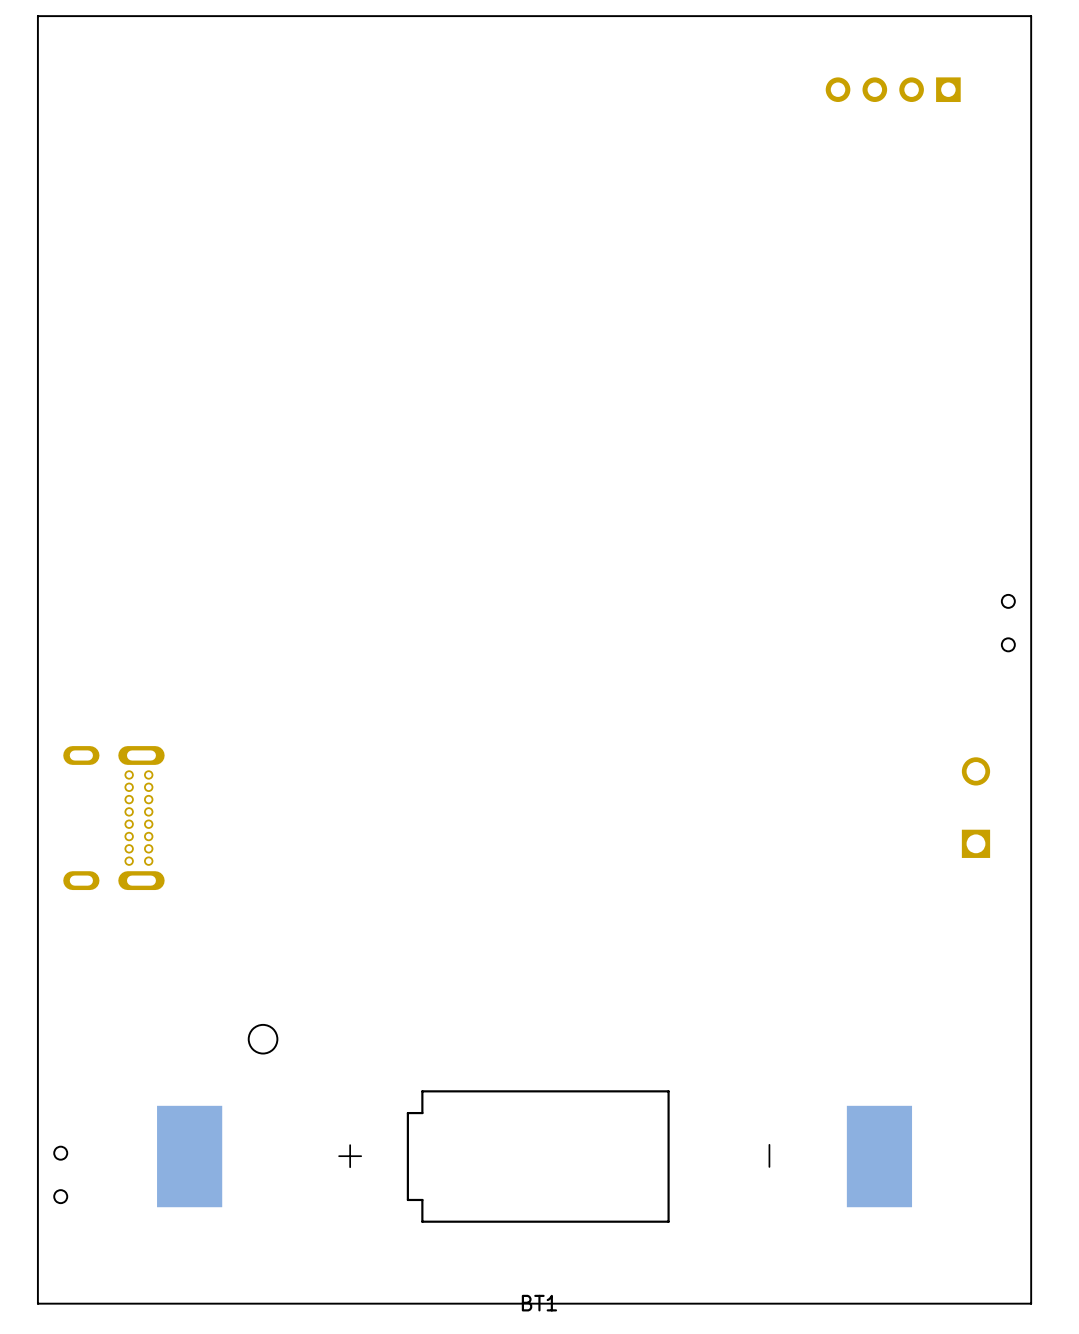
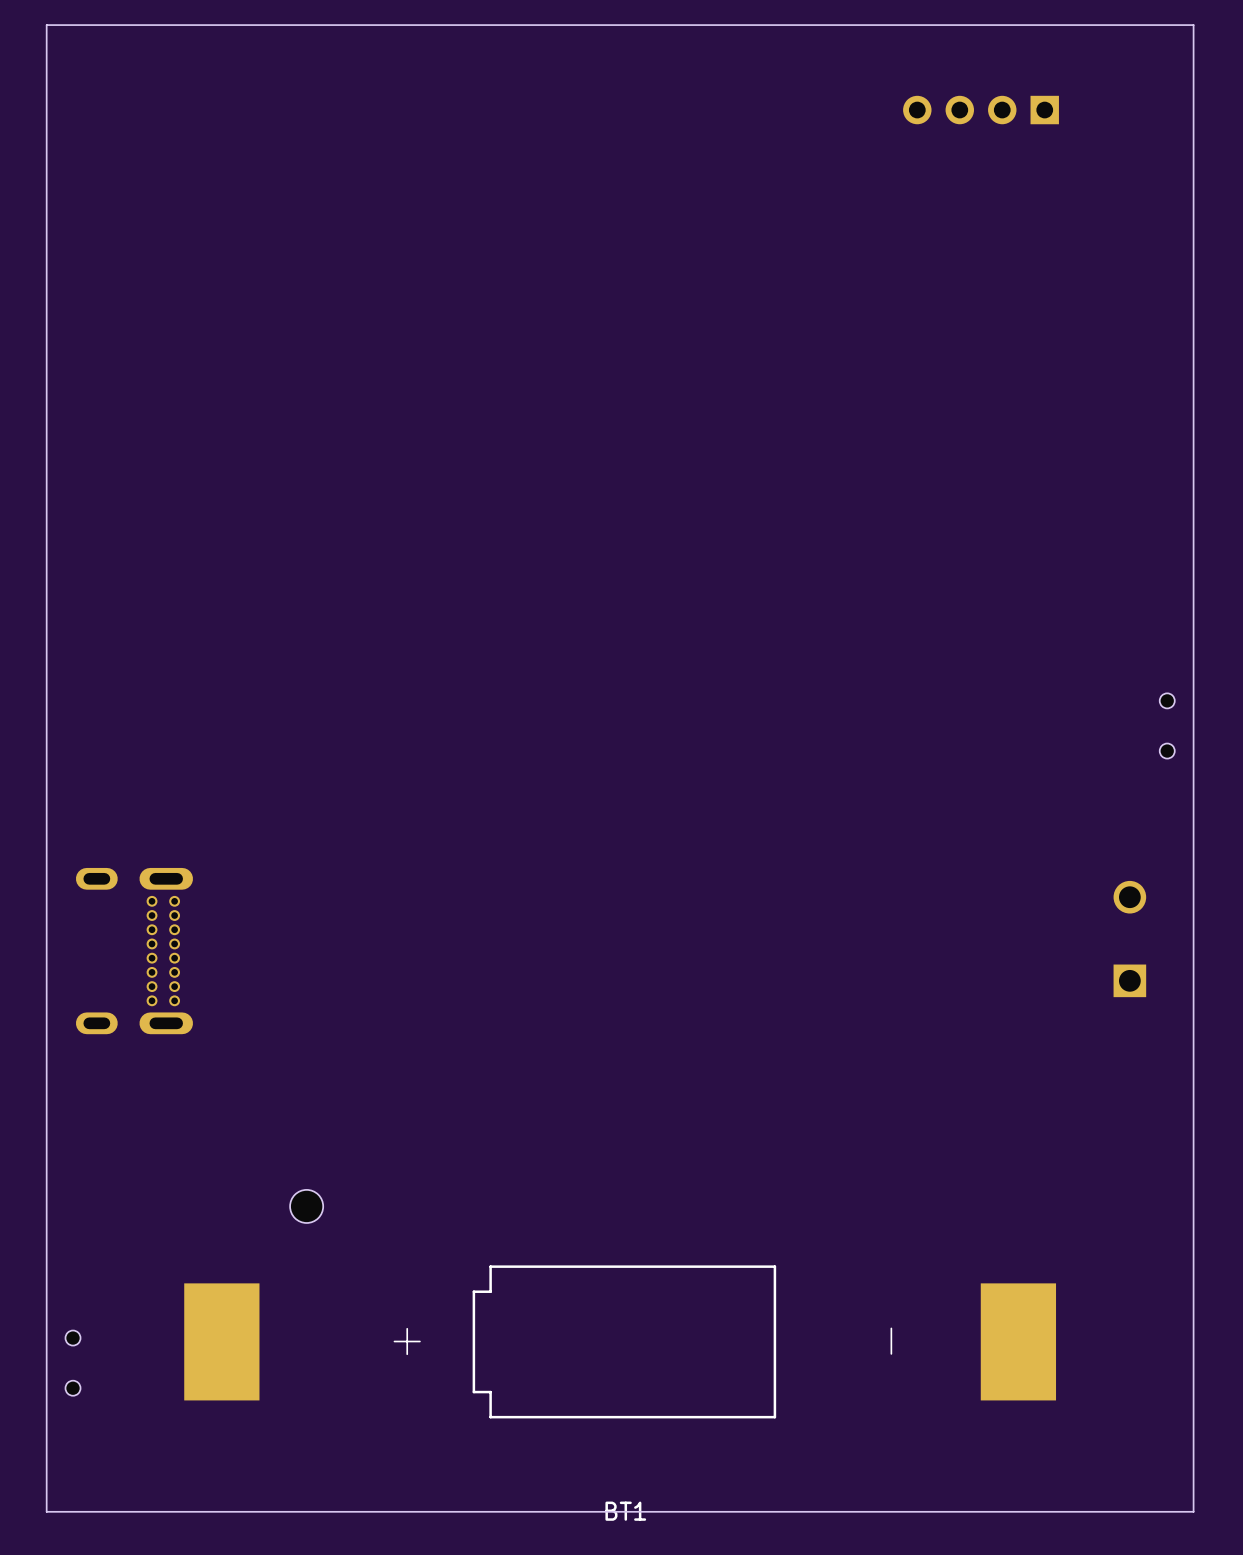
part position: (893, 89) -> (981, 110)

